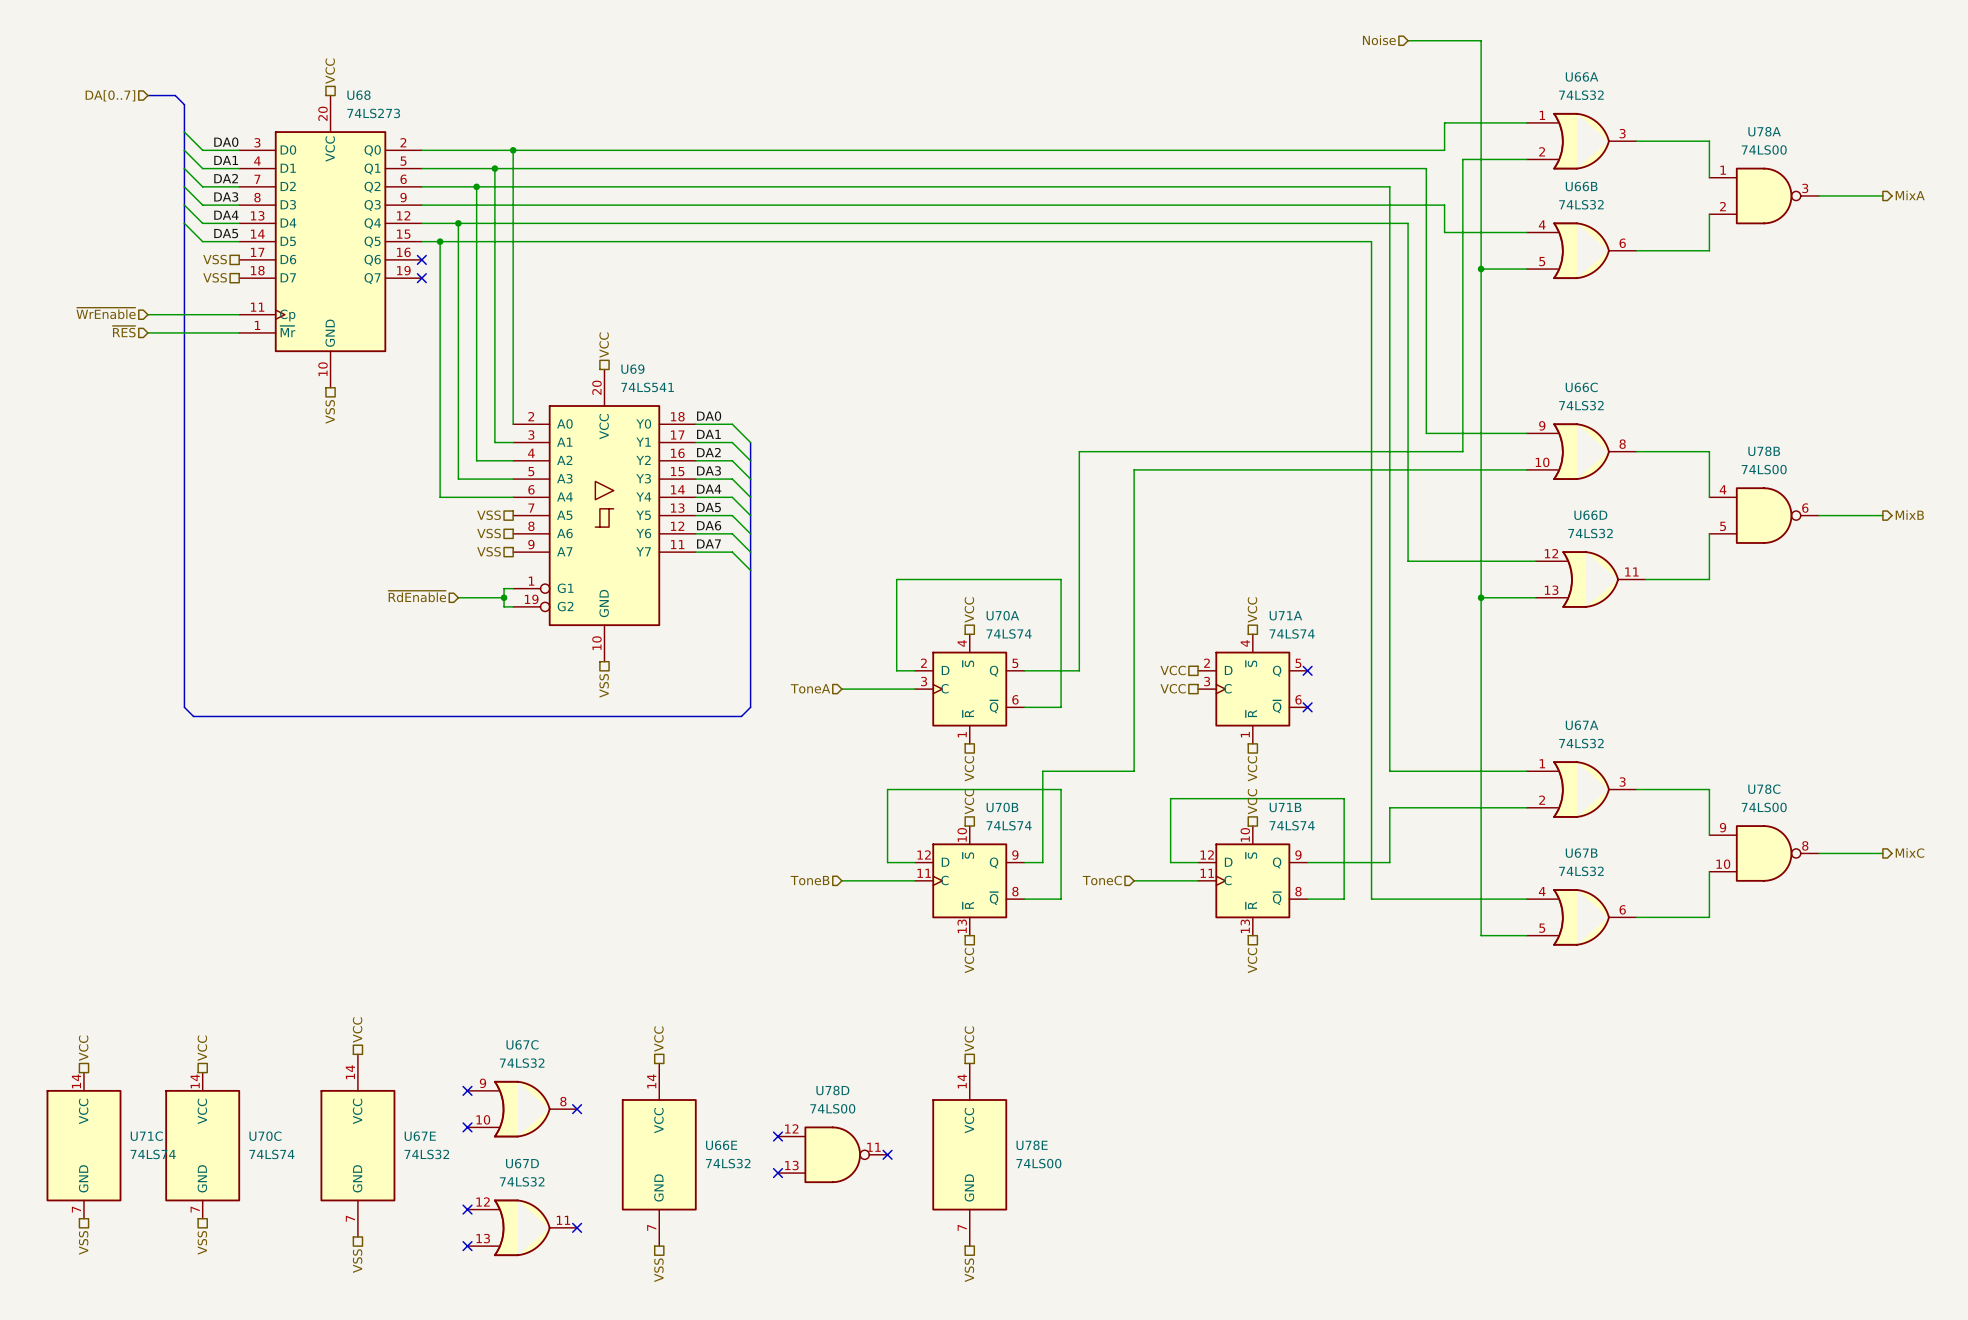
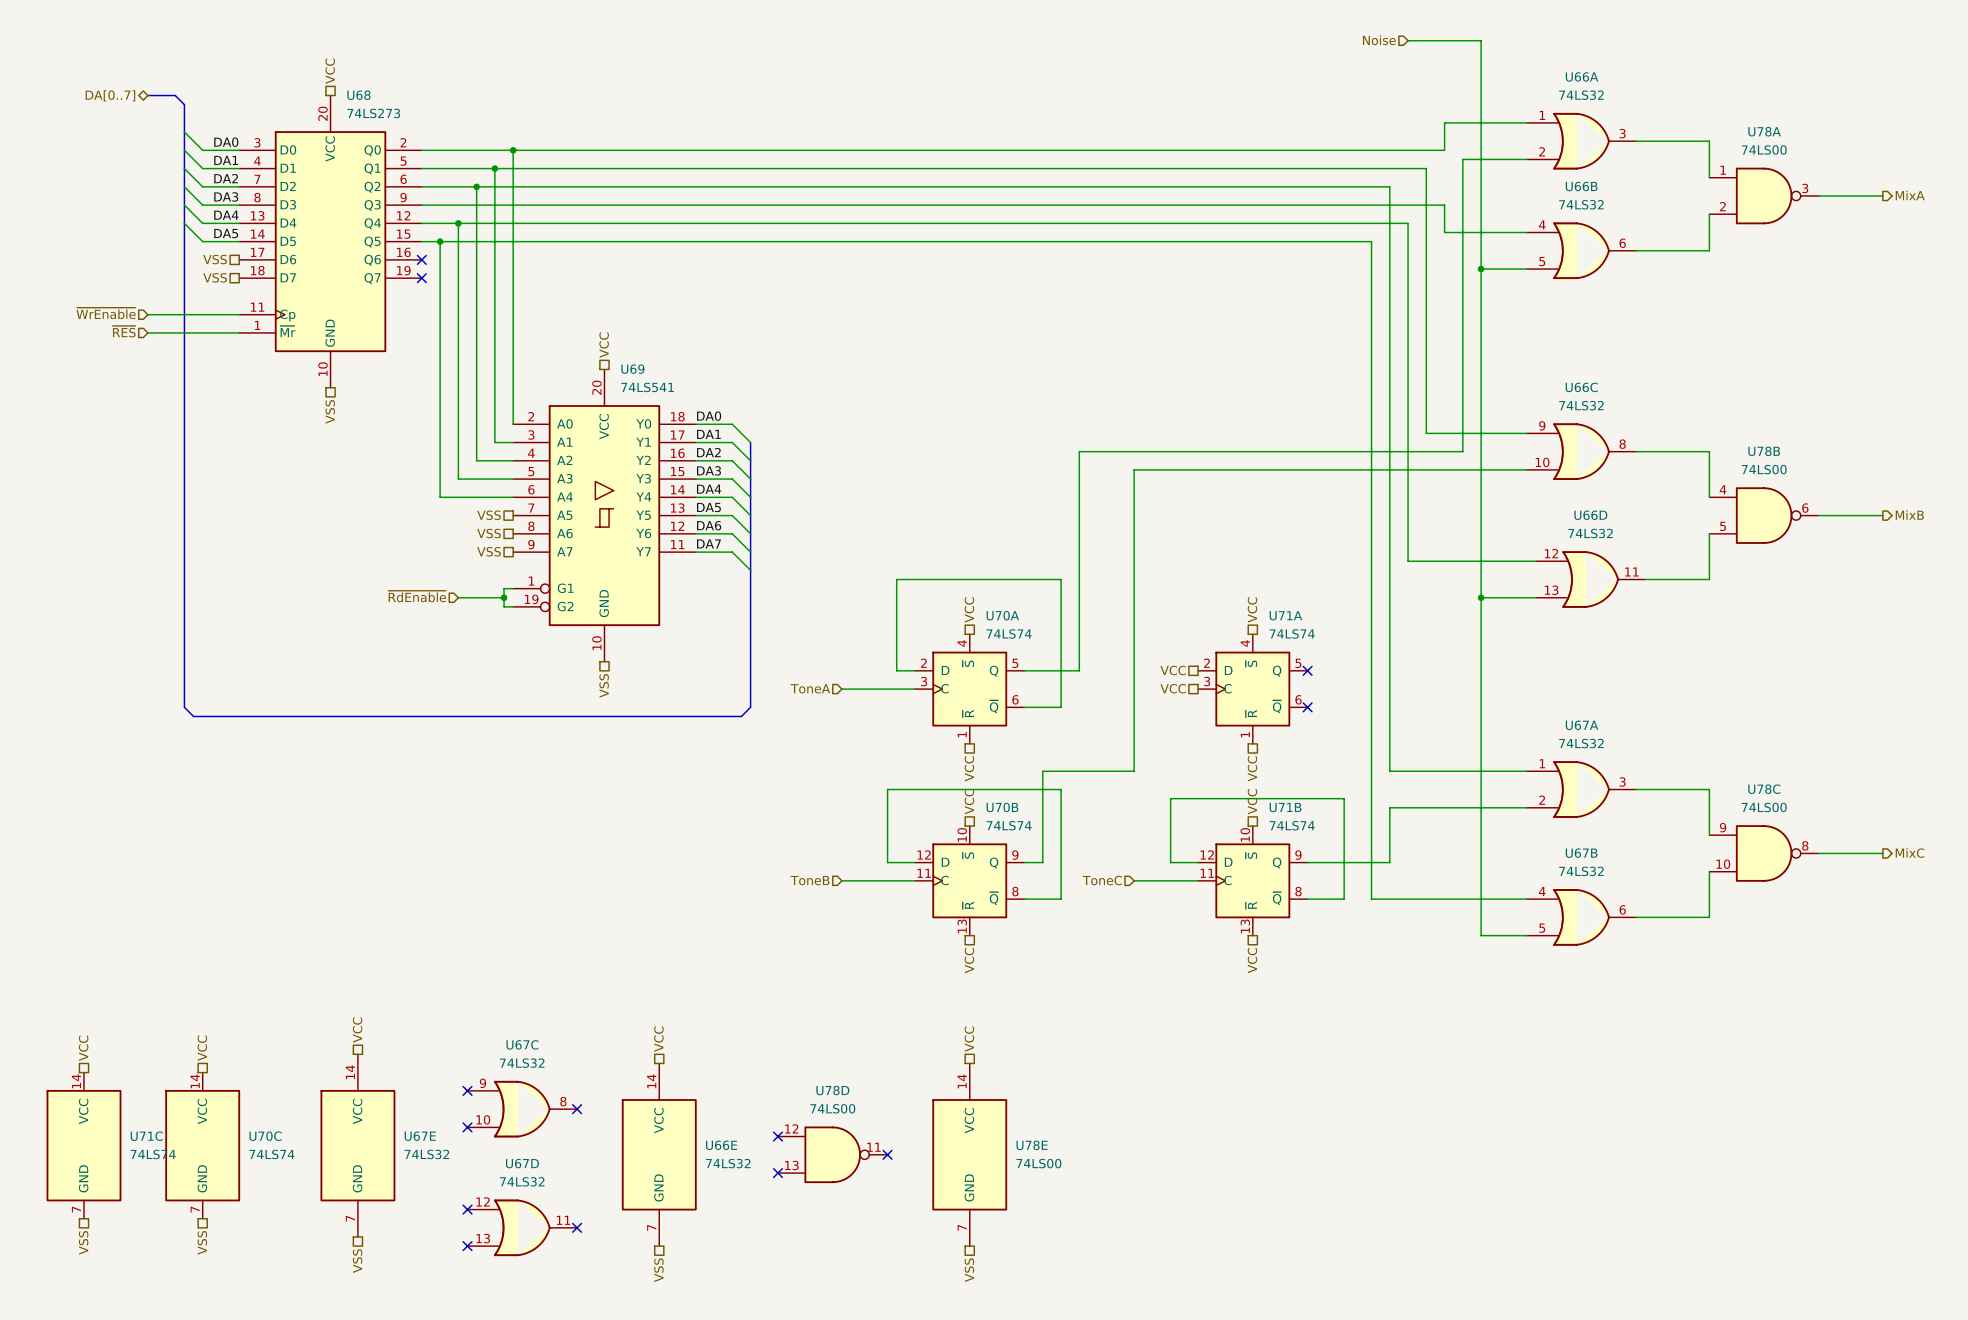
hierarchical label shape: input (110, 95) -> bidirectional (110, 95)

